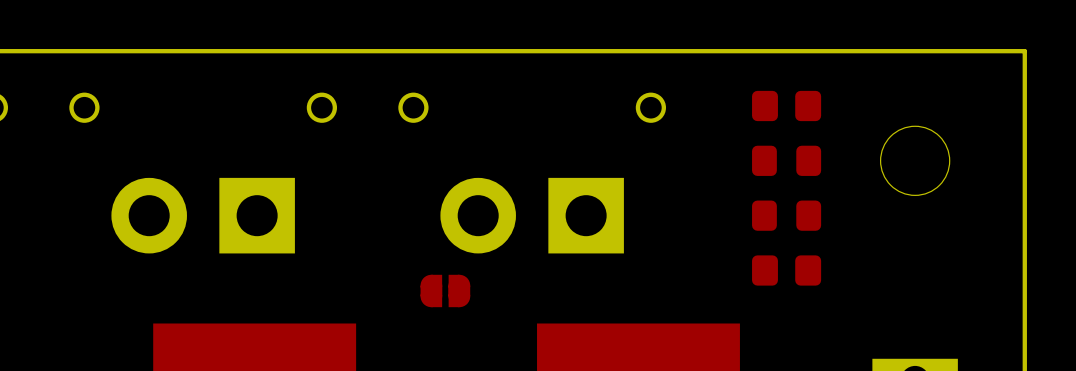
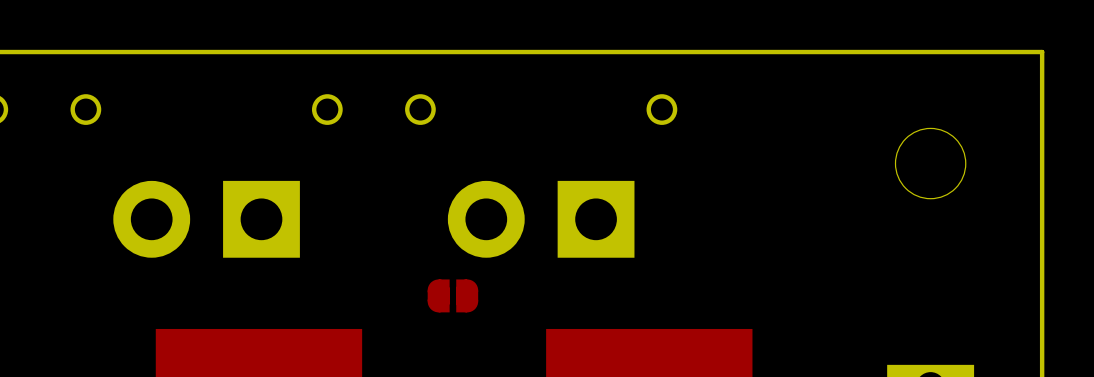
part: (786, 105) -> none
part: (786, 160) -> none
part: (786, 215) -> none
part: (786, 270) -> none

